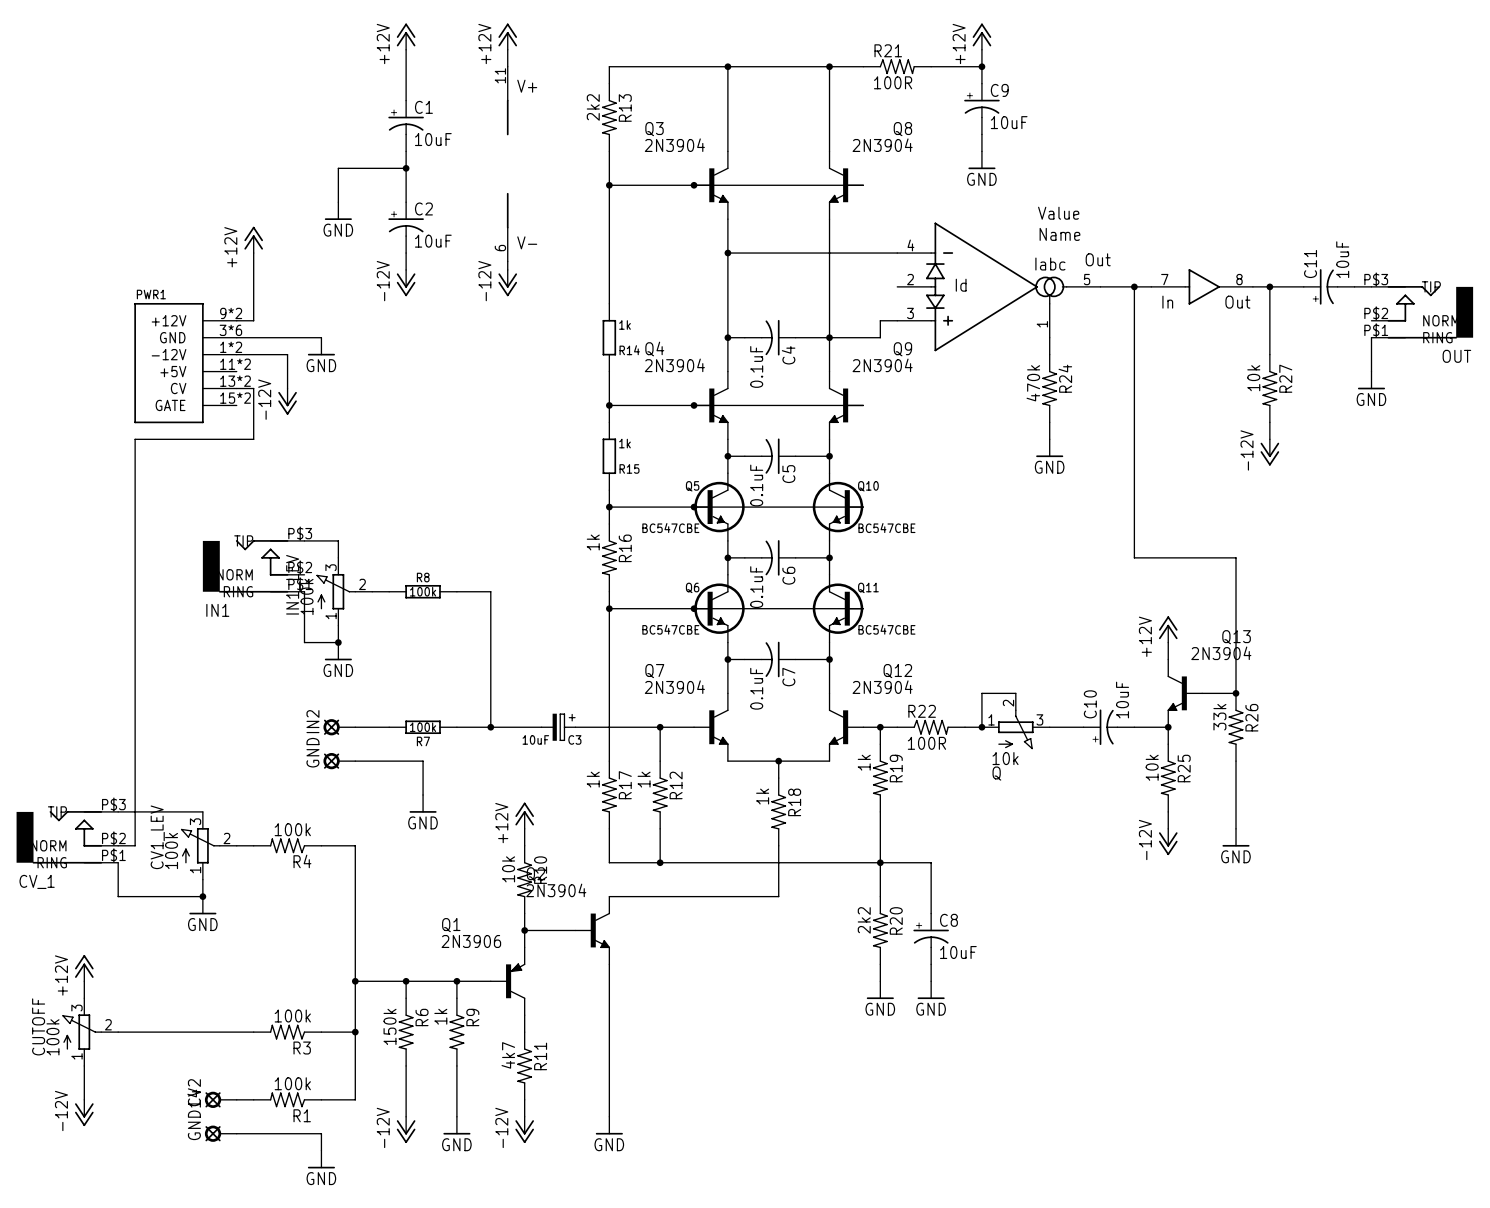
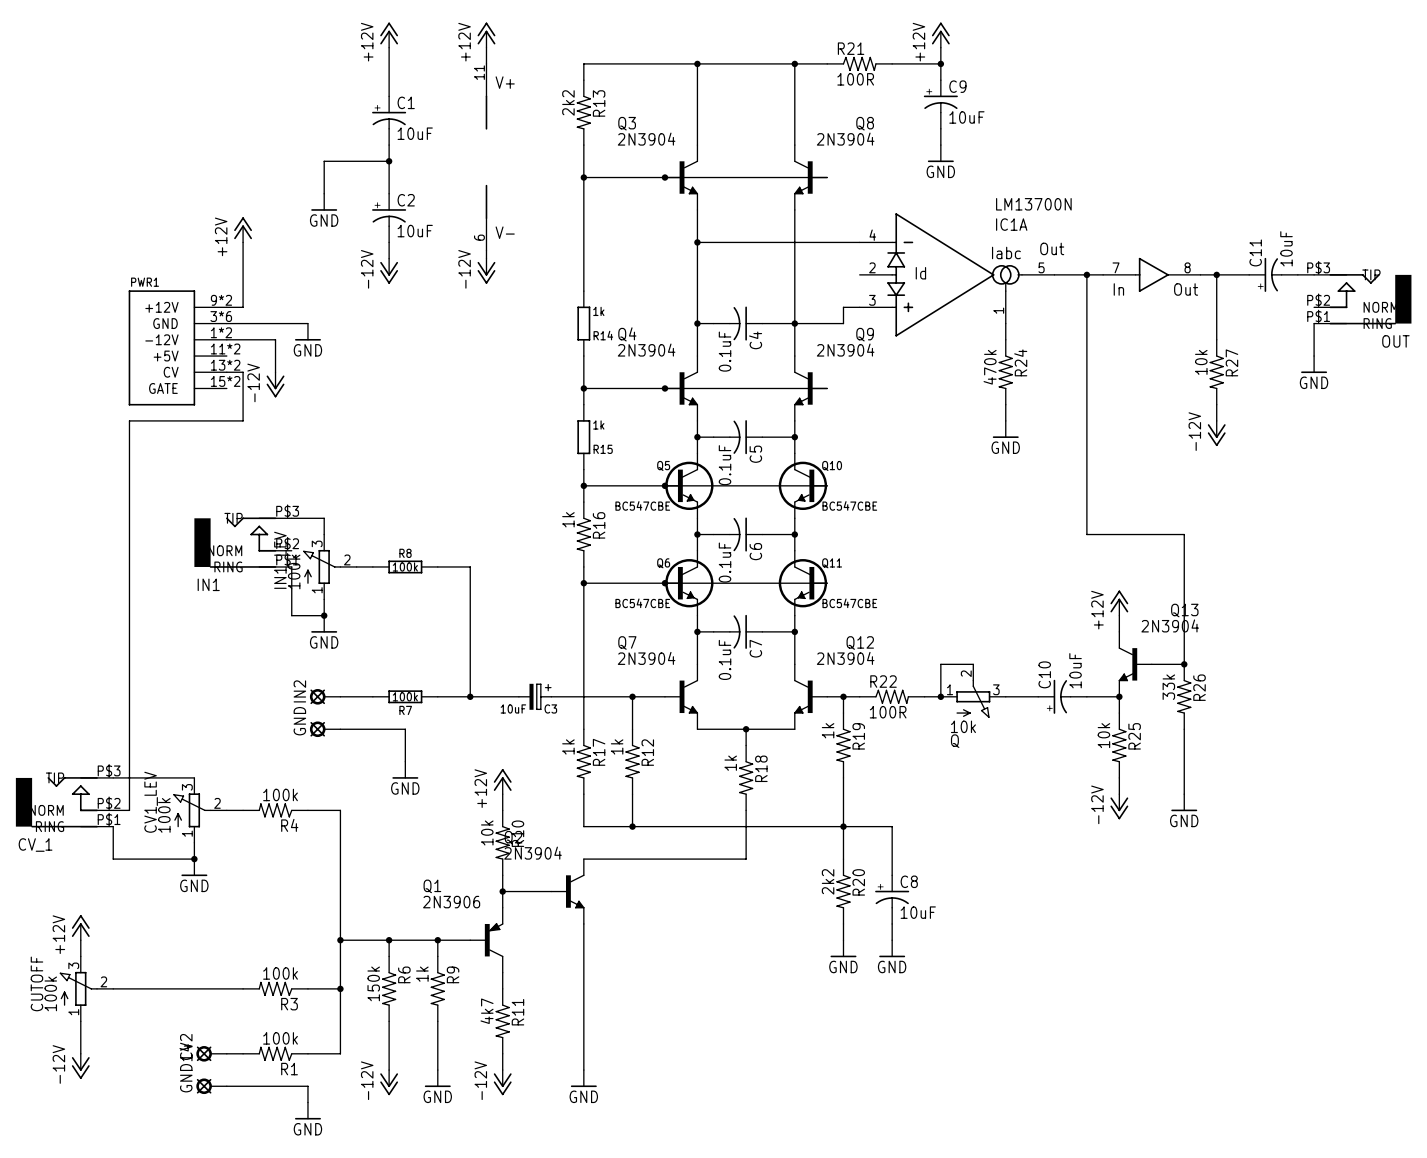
IC1A text: Value (1058, 213) -> none
IC1A value: none -> LM13700N (1033, 204)
IC1A name: none -> IC1A (1011, 224)
IC1A text: Name (1059, 234) -> none

